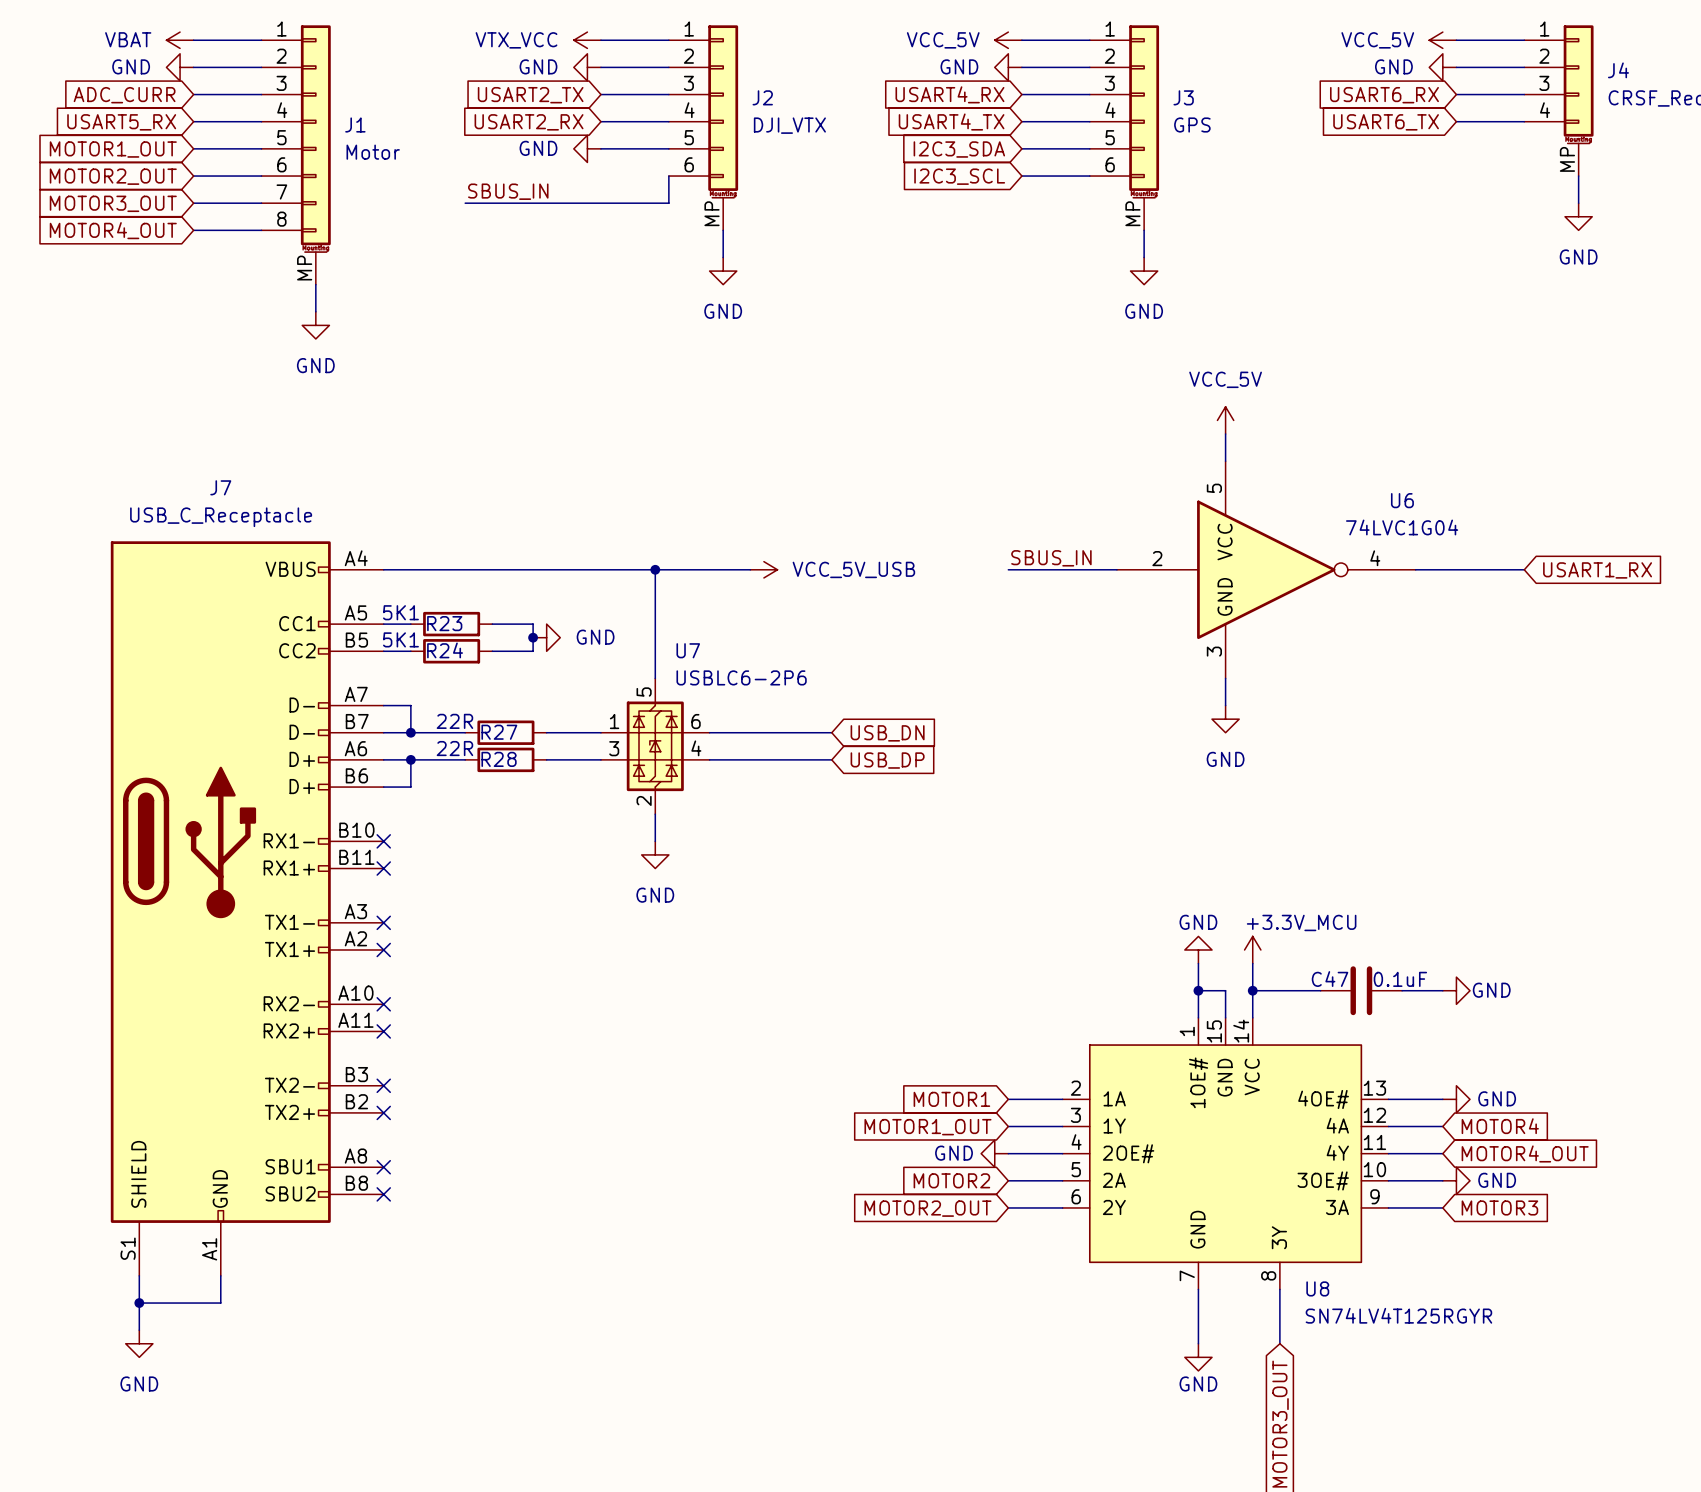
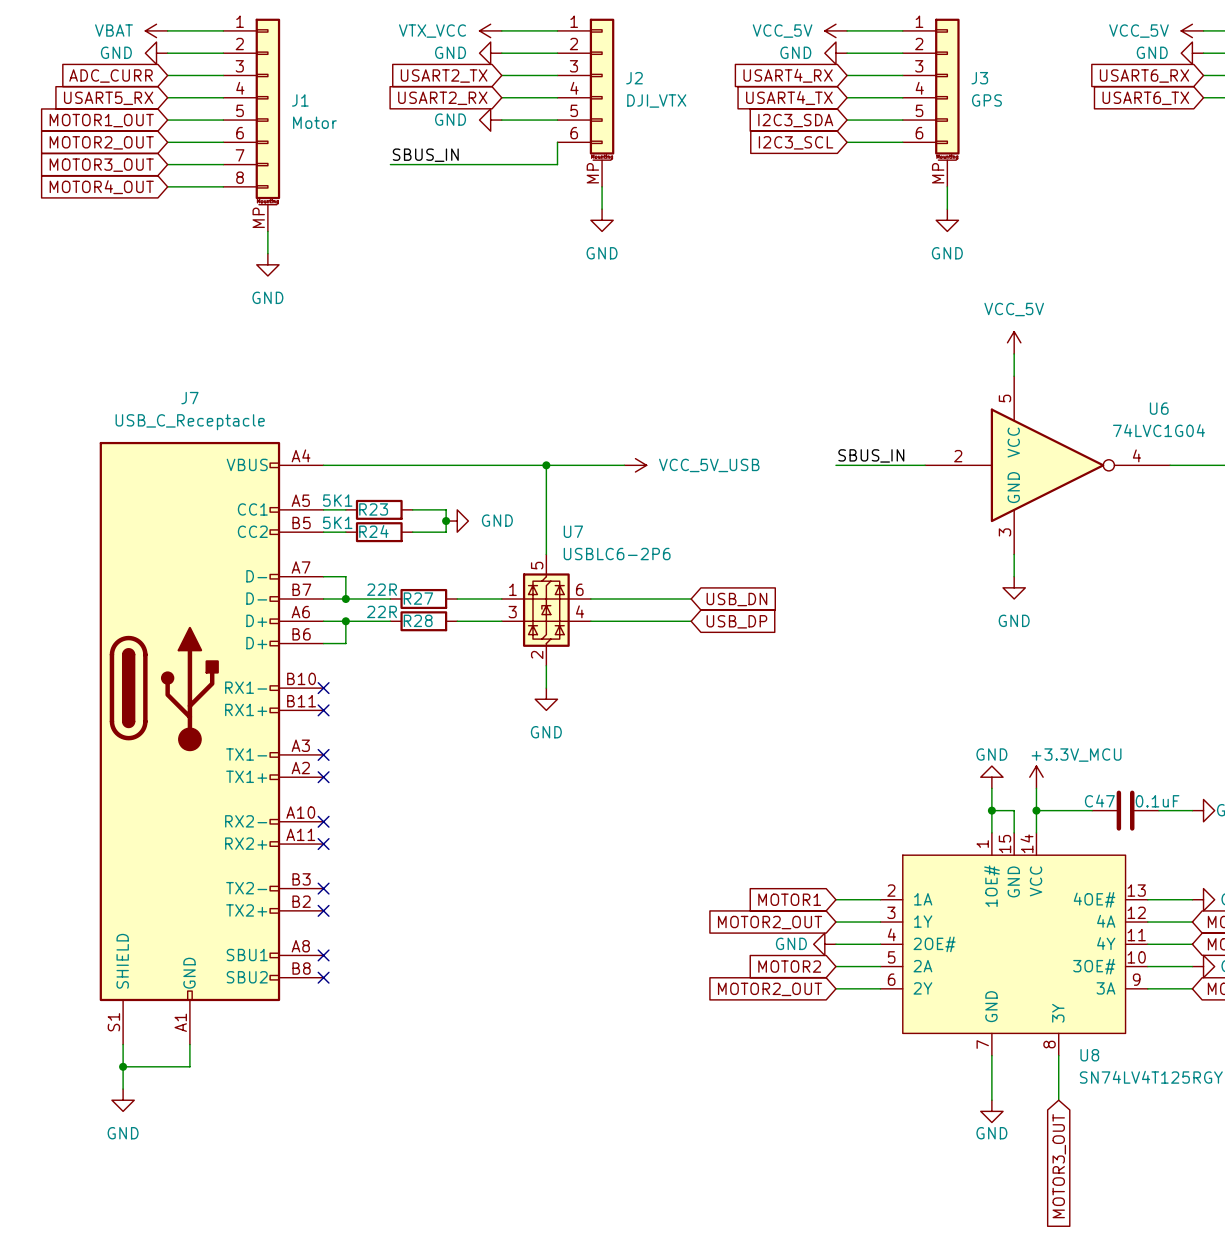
global label: MOTOR1_OUT (927, 1127) -> MOTOR2_OUT (770, 922)

